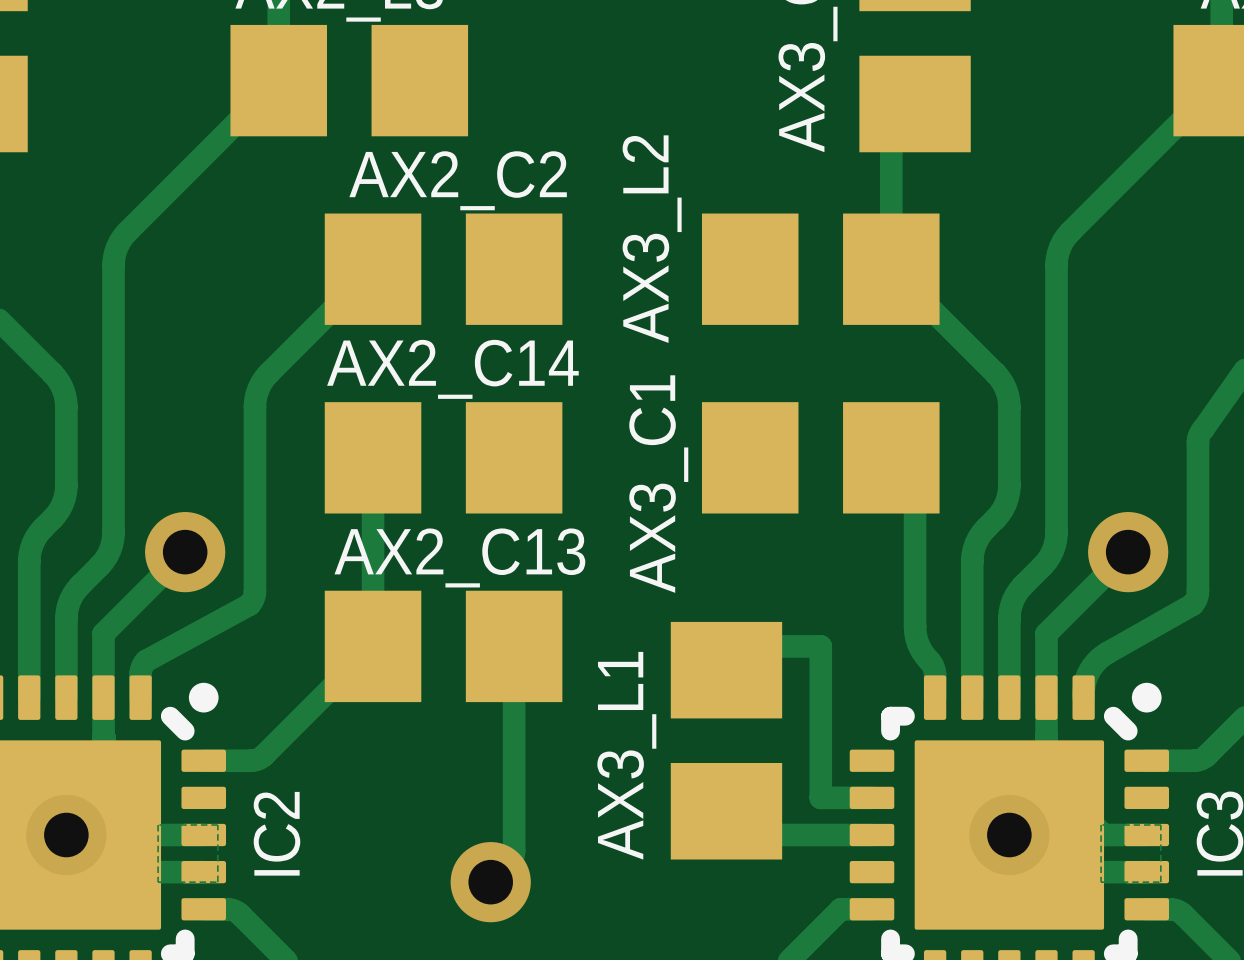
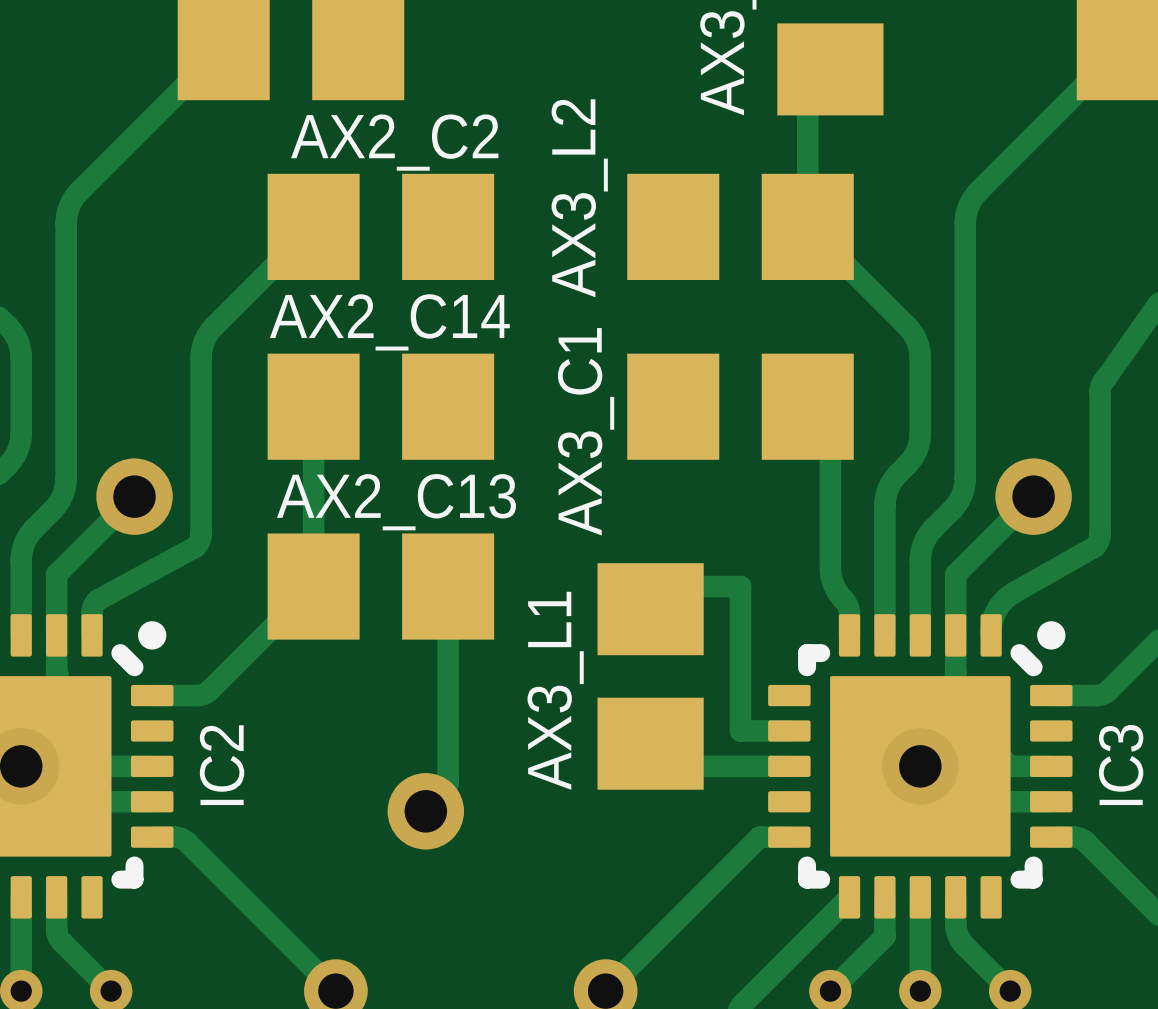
zone outline: (158, 824) (217, 824) (217, 882) (158, 882) (158, 824) -> none
zone outline: (1101, 824) (1160, 824) (1160, 882) (1101, 882) (1101, 824) -> none

